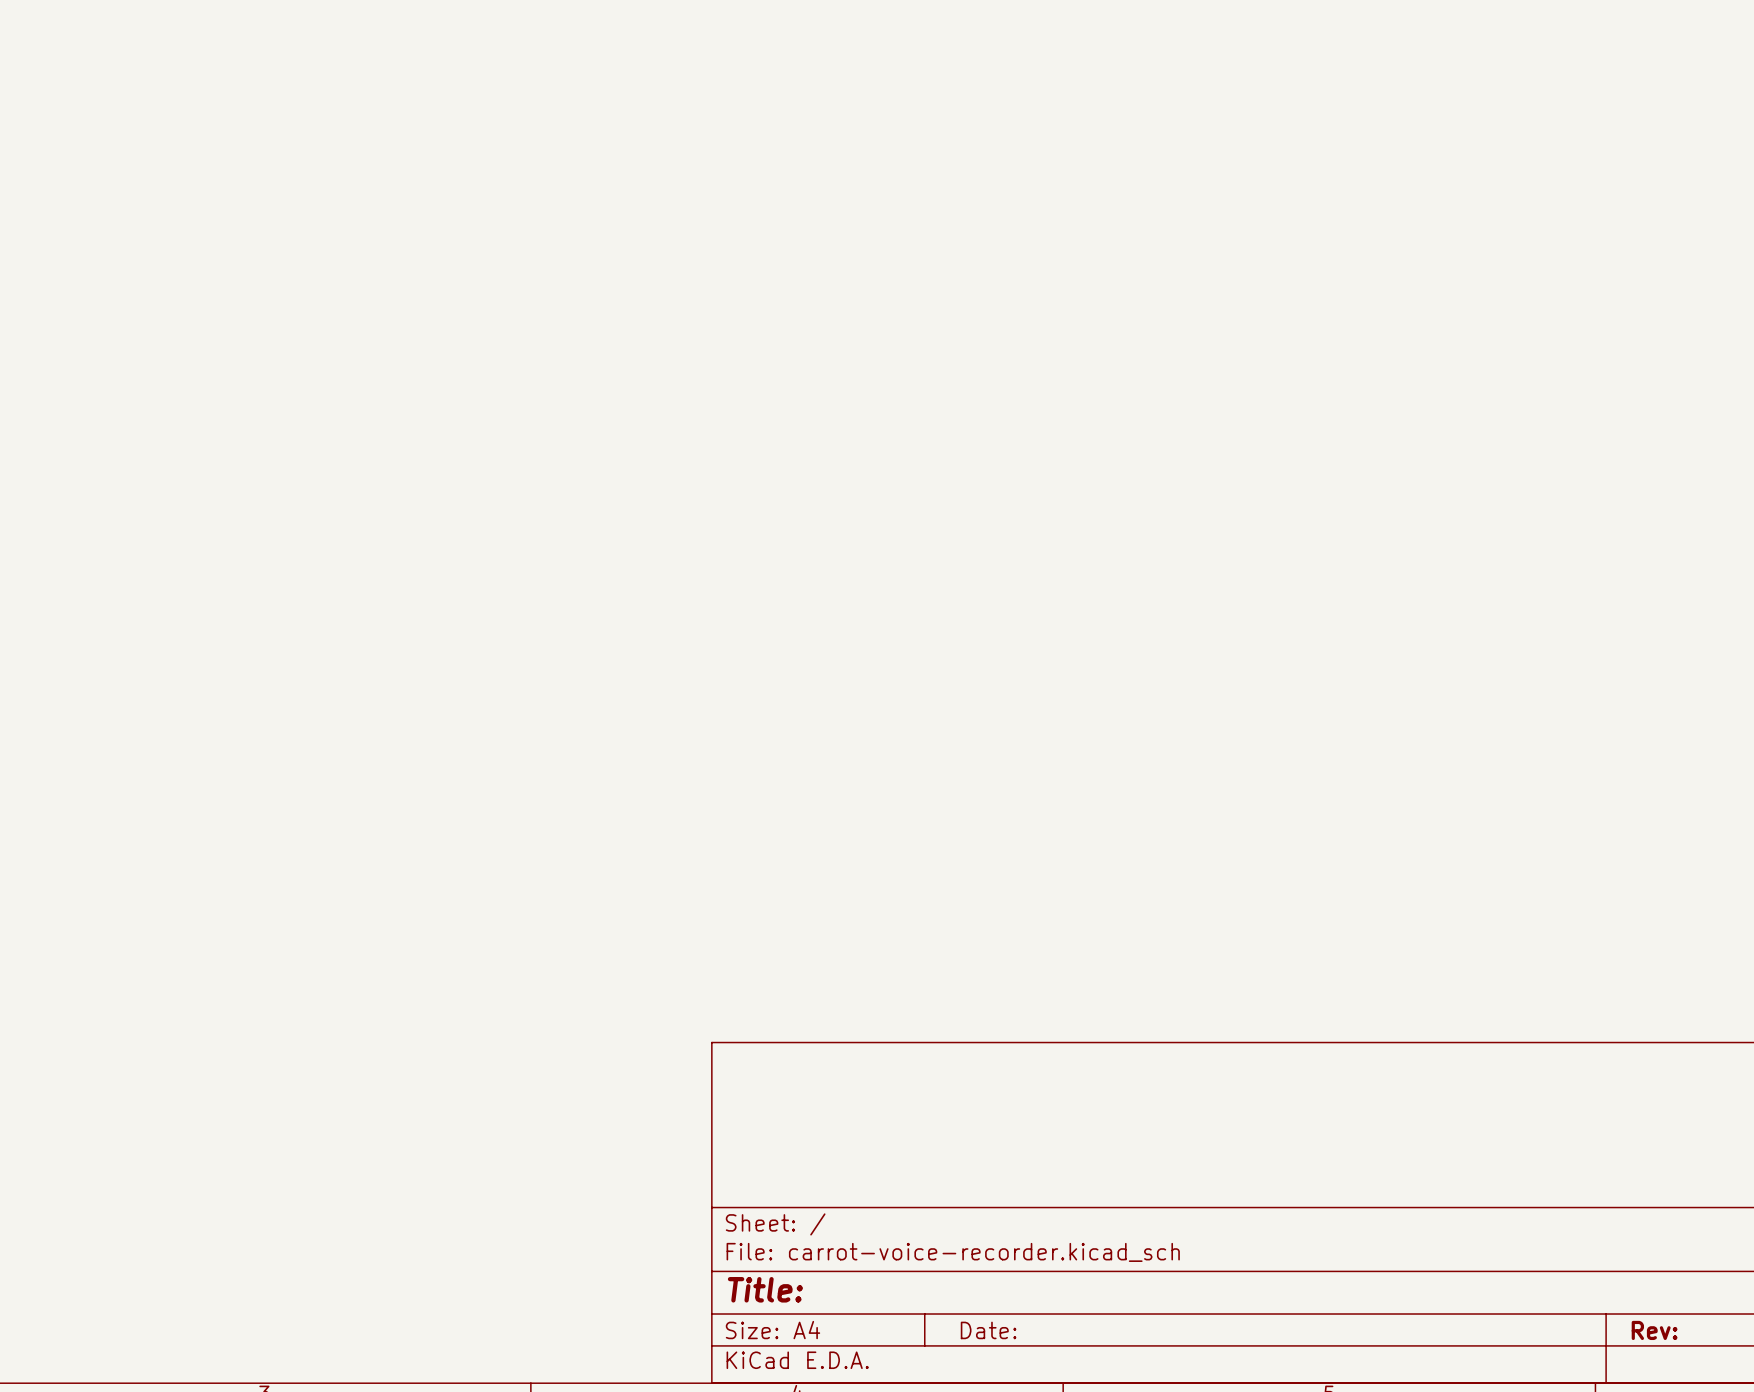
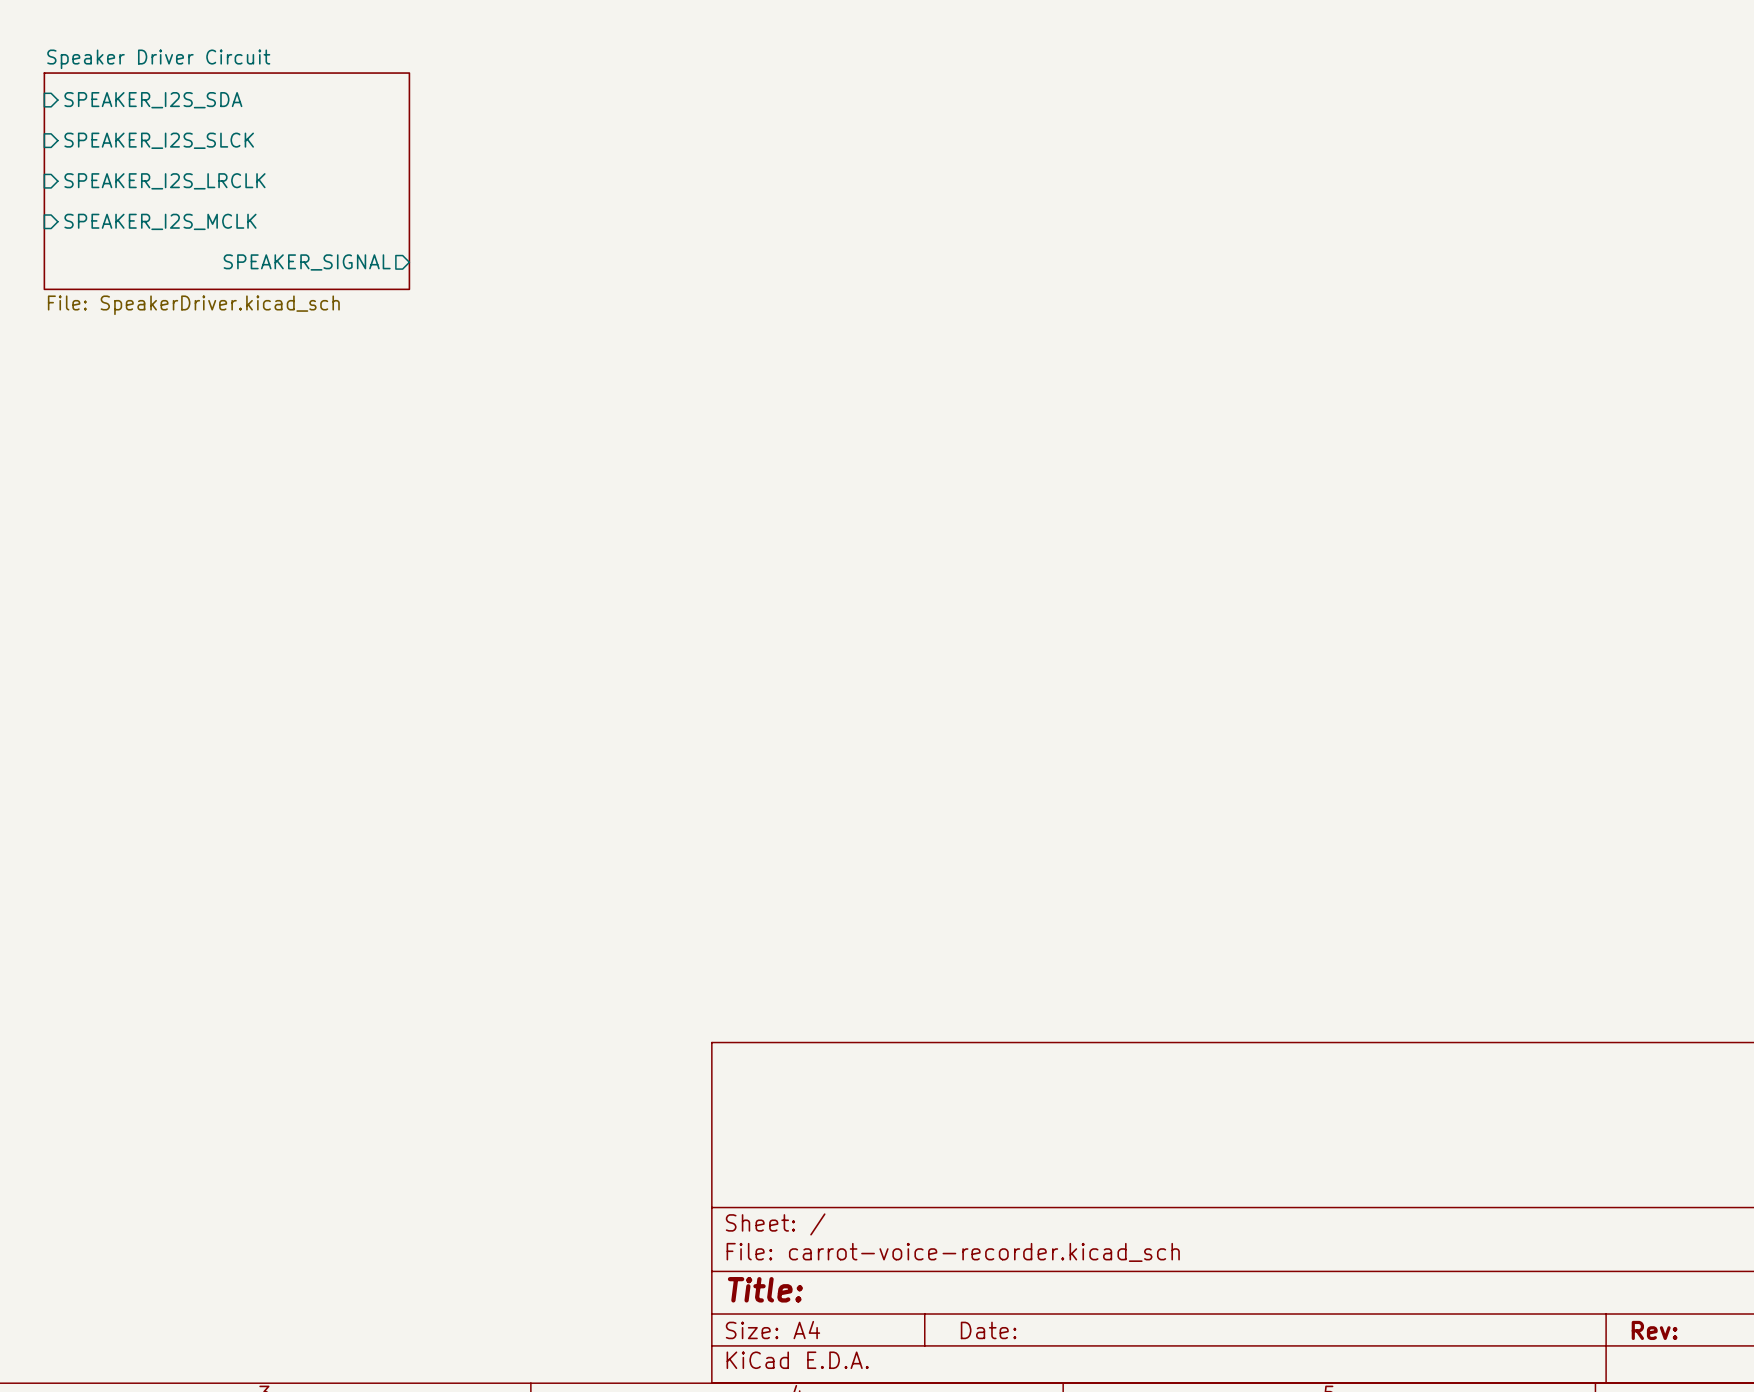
sheet pin: none -> SPEAKER_I2S_SDA (153, 100)
sheet pin: none -> SPEAKER_I2S_SLCK (159, 140)
sheet pin: none -> SPEAKER_I2S_LRCLK (164, 181)
sheet Speaker Driver Circuit: none -> File: SpeakerDriver.kicad_sch (226, 181)
sheet pin: none -> SPEAKER_I2S_MCLK (160, 221)
sheet pin: none -> SPEAKER_SIGNAL (307, 262)

